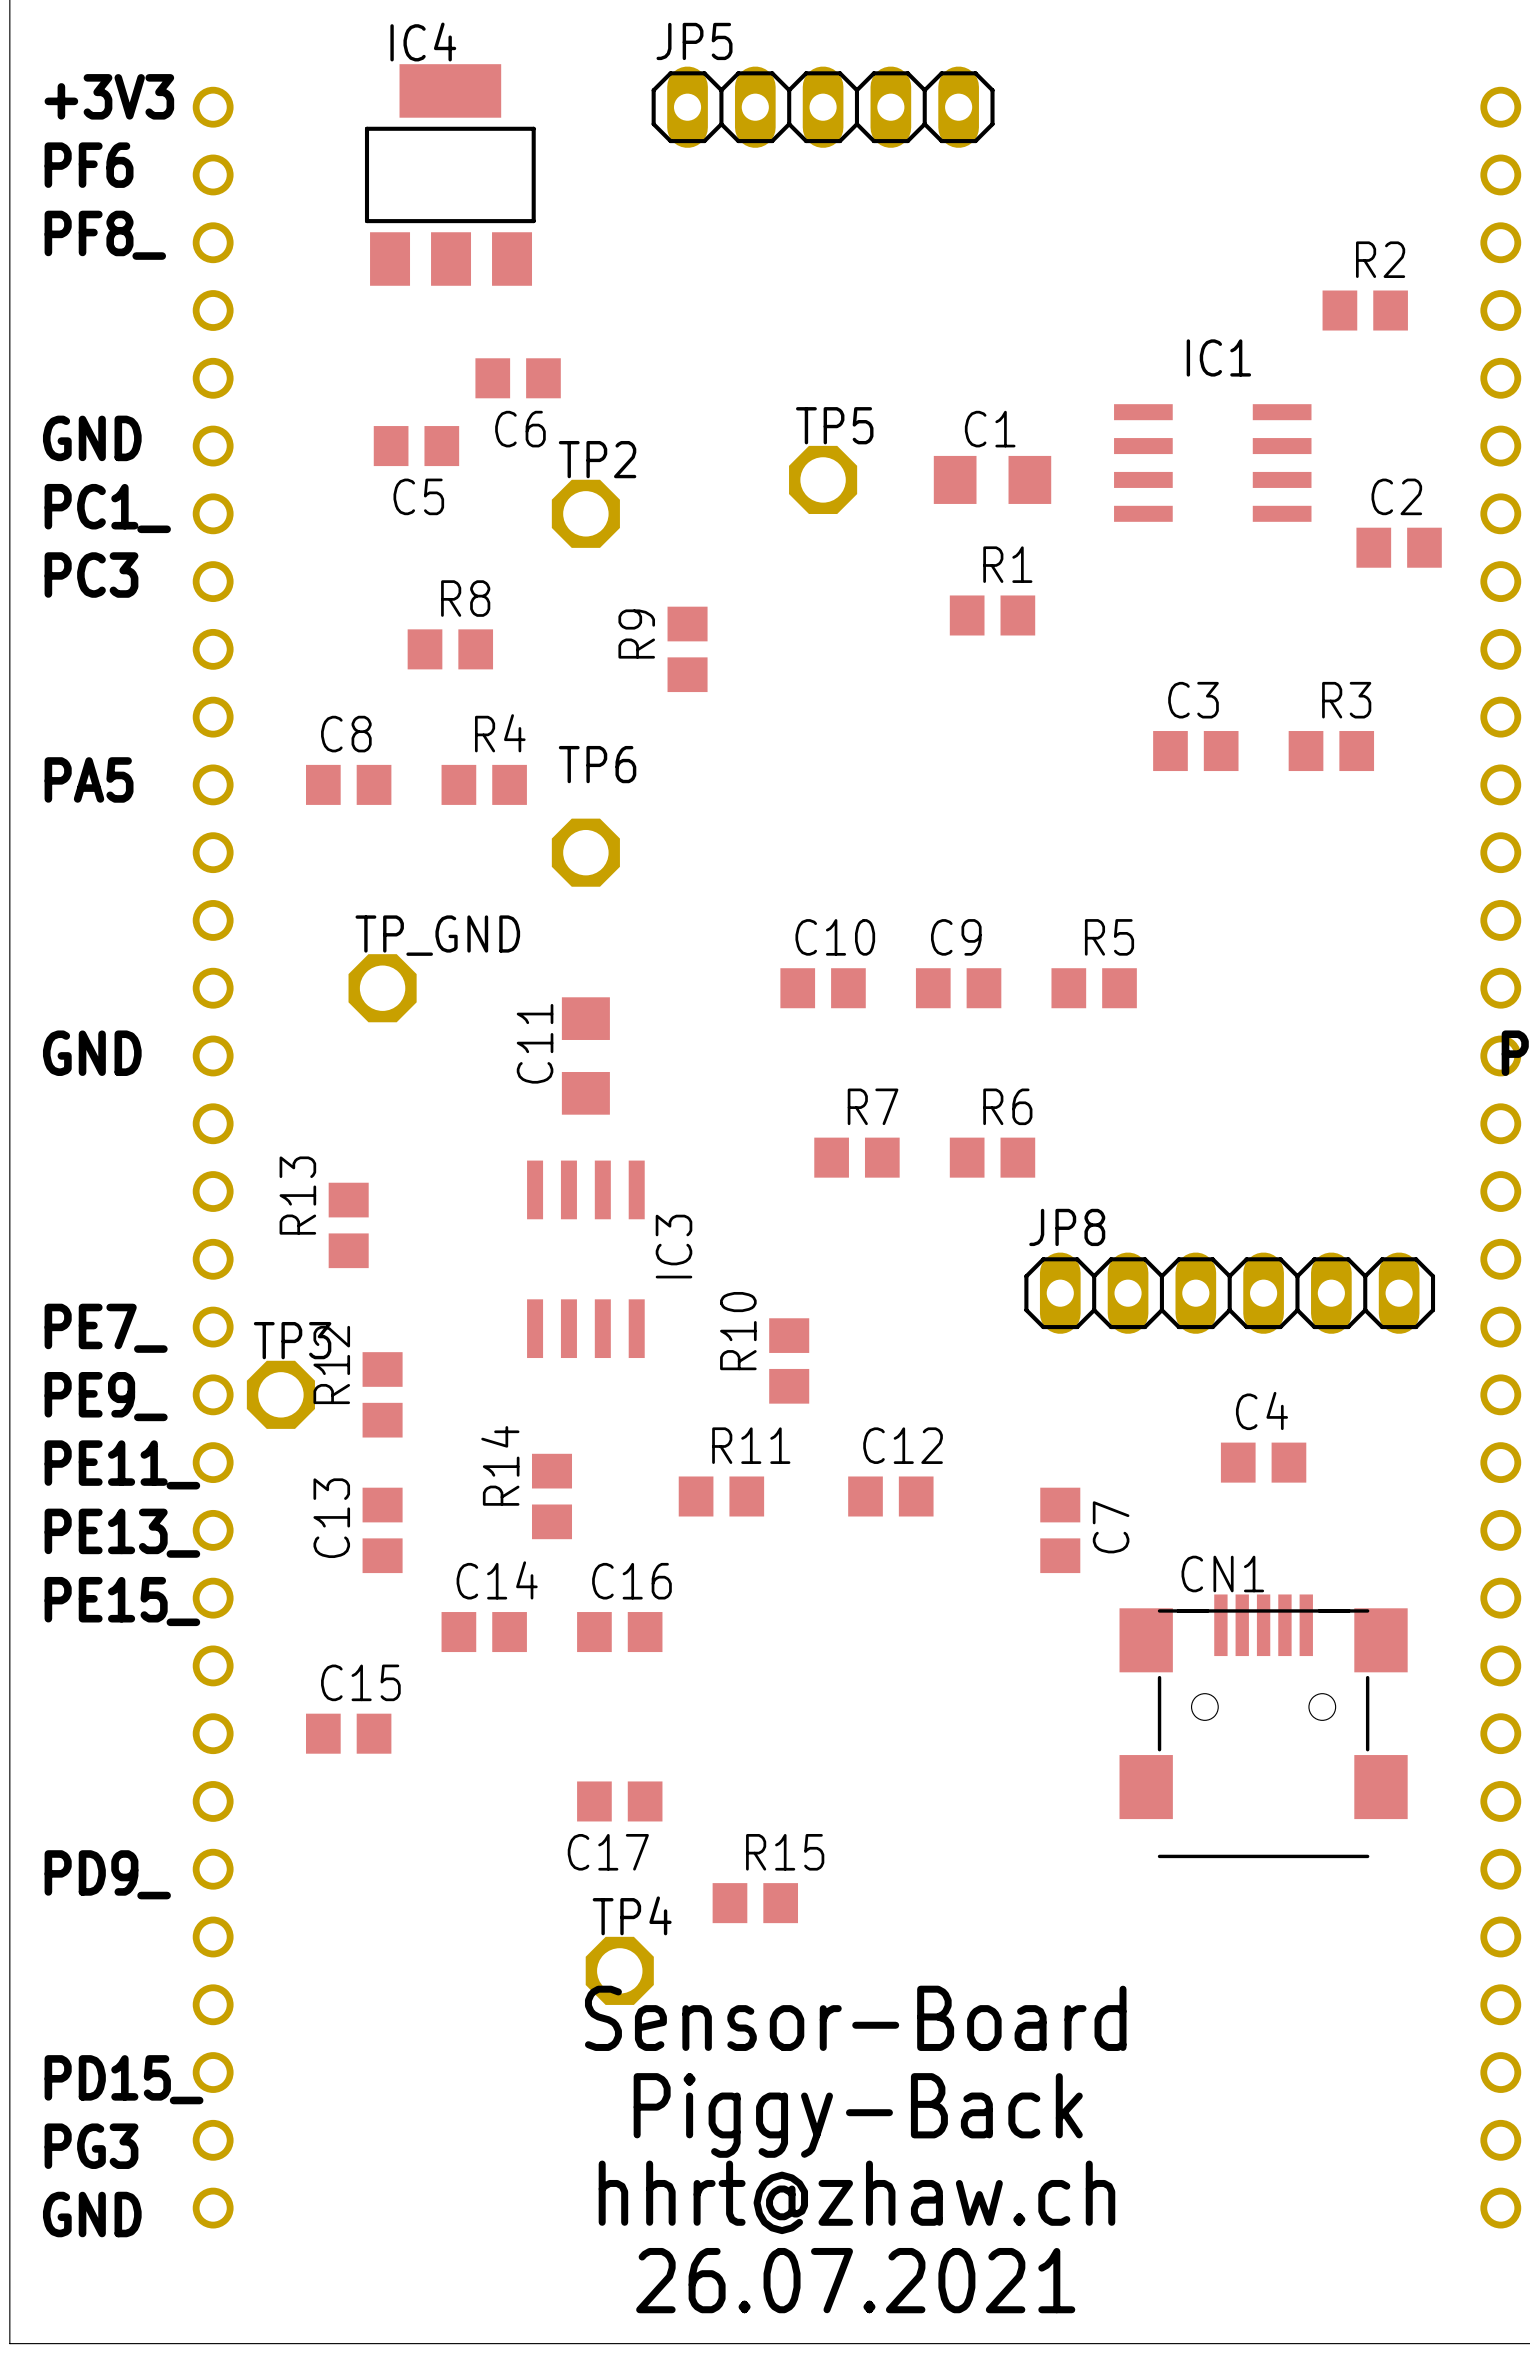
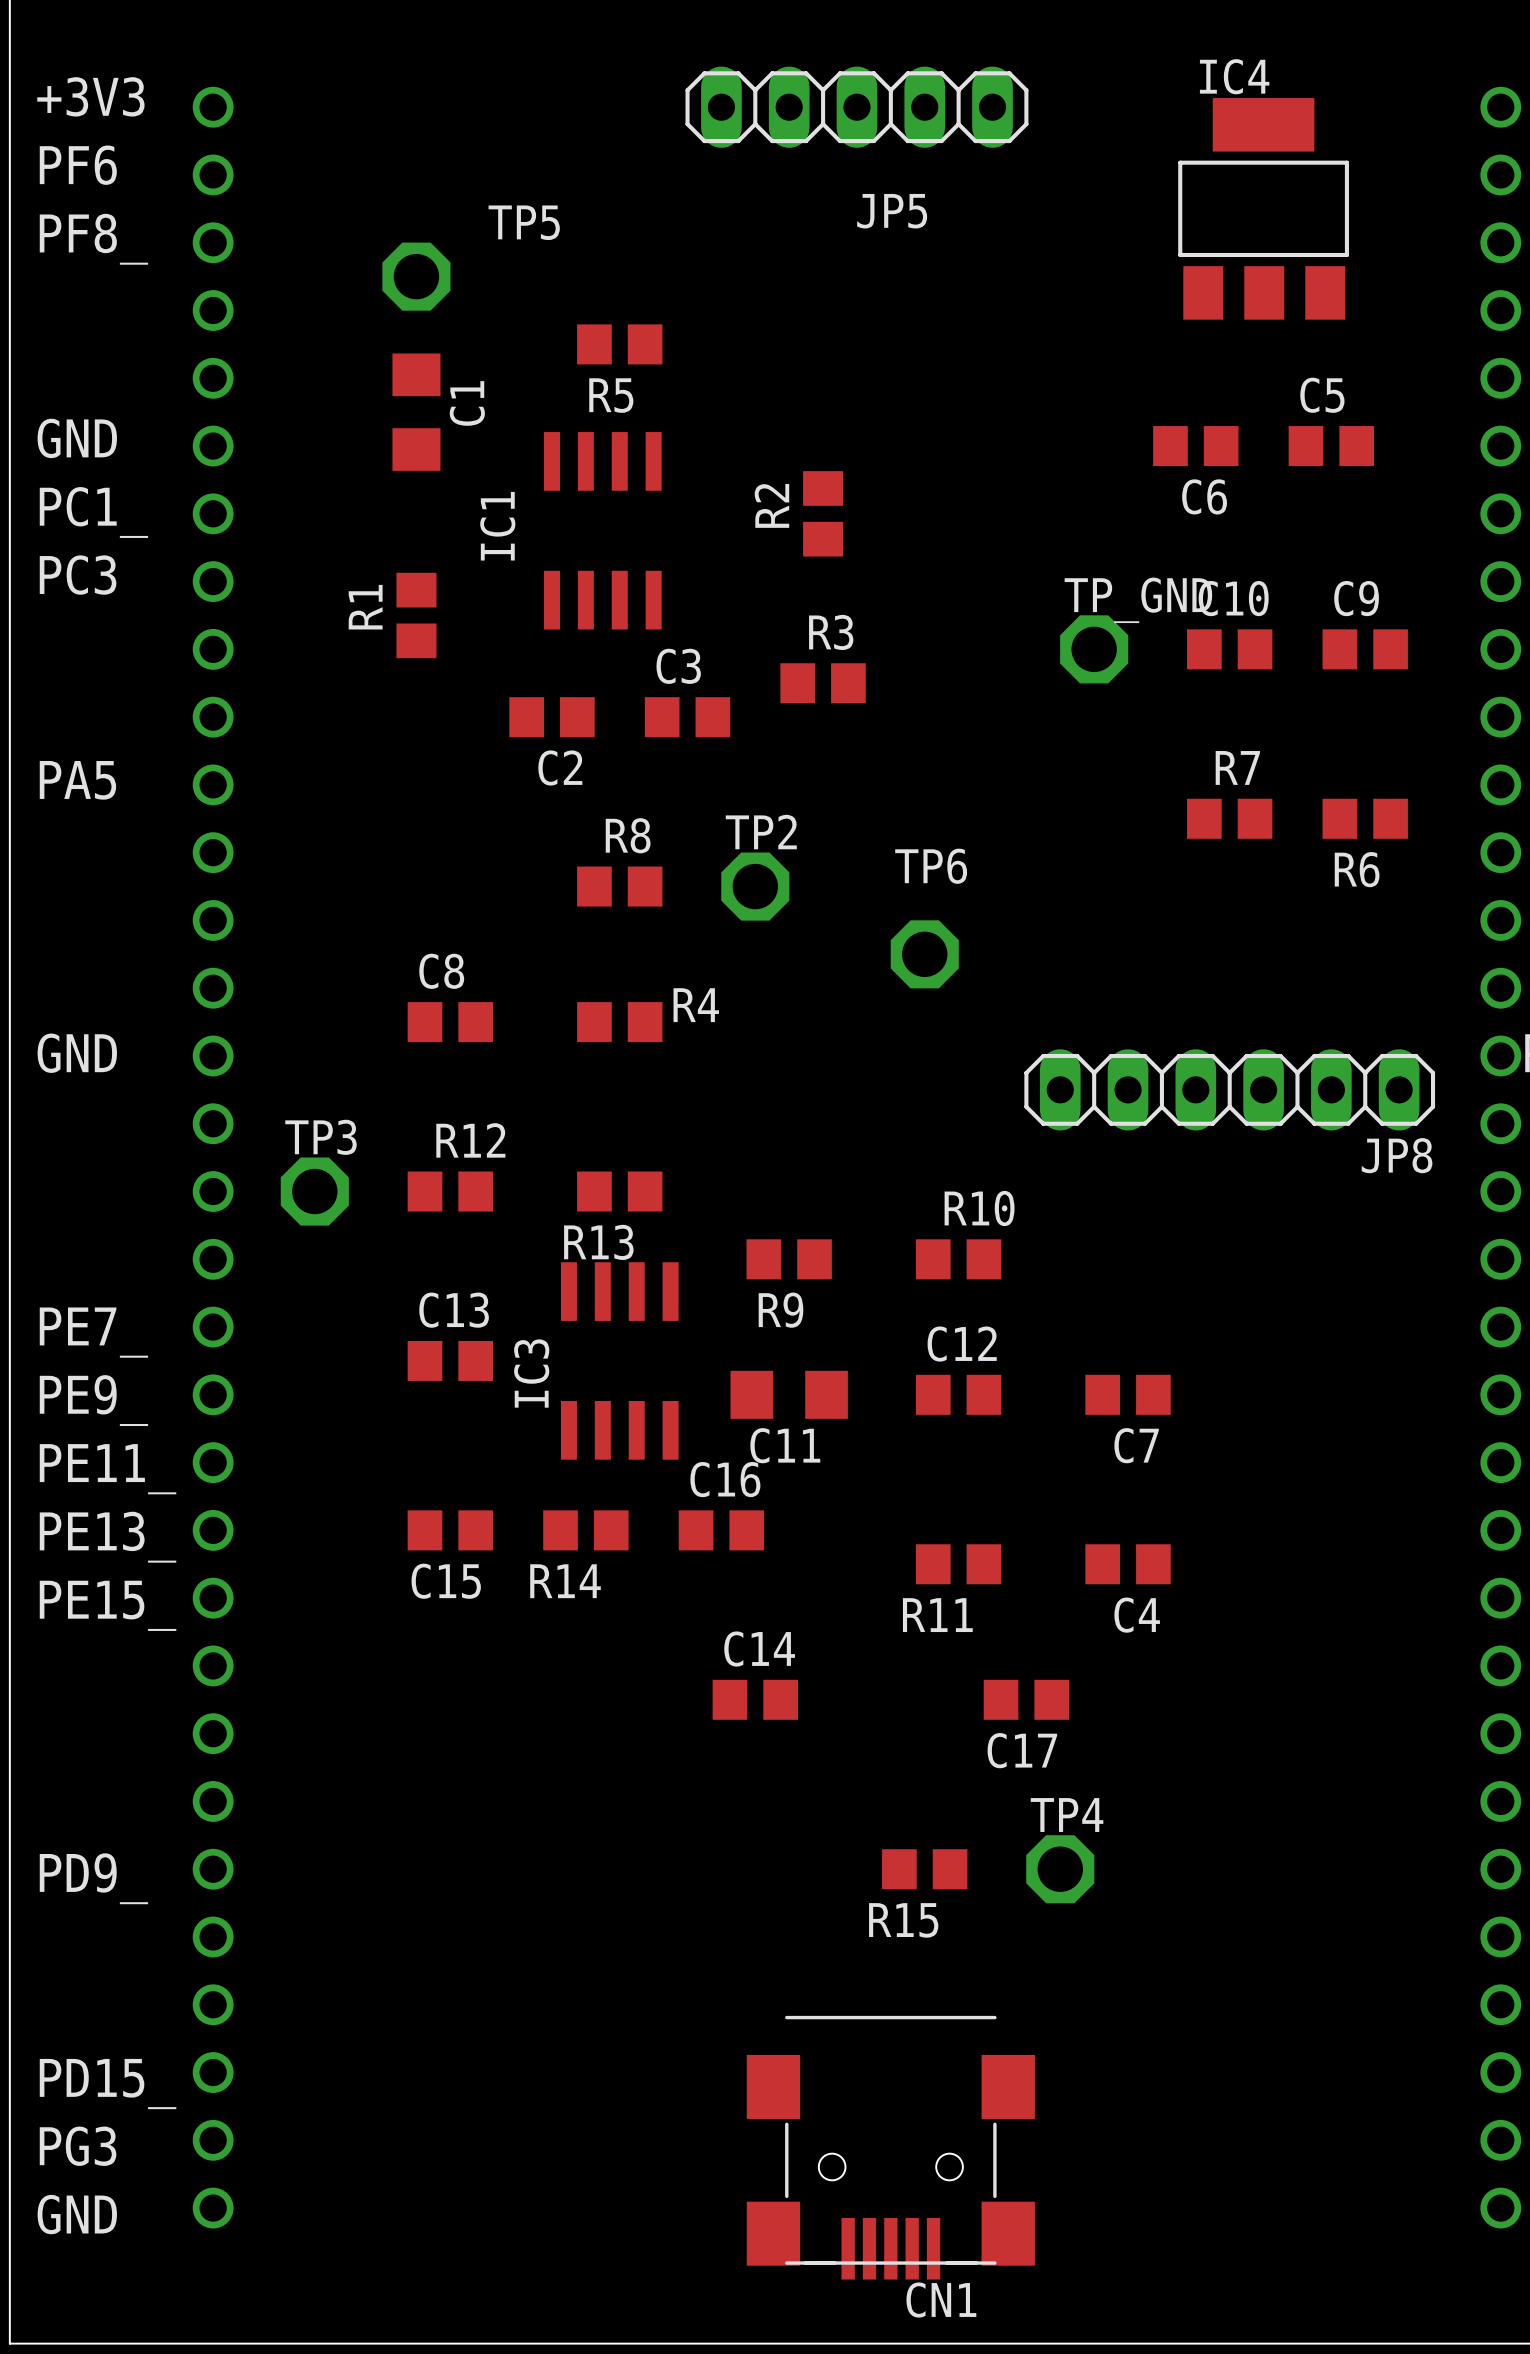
JP5 name position: JP5 (694, 41) -> JP5 (892, 211)
JP5 position: (823, 107) -> (856, 107)
IC4 position: (450, 174) -> (1263, 208)
R2 name position: R2 (1380, 259) -> R2 (771, 505)
R2 rotation: 0° (1365, 310) -> 90° clockwise (823, 513)
R2 position: (1365, 310) -> (823, 513)
IC1 name position: IC1 (1218, 357) -> IC1 (497, 526)
C6 position: (518, 378) -> (1195, 446)
TP5 name position: TP5 (834, 425) -> TP5 (524, 222)
C5 position: (416, 446) -> (1331, 446)
IC1 rotation: 0° (1212, 463) -> 90° clockwise (602, 530)
IC1 position: (1212, 463) -> (602, 530)
TP5 position: (823, 479) -> (416, 276)
C1 rotation: 0° (992, 479) -> 90° clockwise (416, 412)
C1 position: (992, 479) -> (416, 412)
C5 name position: C5 (418, 496) -> C5 (1322, 395)
C2 name position: C2 (1396, 496) -> C2 (560, 767)
TP2 position: (585, 513) -> (755, 886)
C2 position: (1399, 547) -> (552, 717)
R1 name position: R1 (1007, 564) -> R1 (365, 607)
R1 rotation: 0° (992, 615) -> 90° clockwise (416, 615)
R1 position: (992, 615) -> (416, 615)
R9 name position: R9 (636, 634) -> R9 (781, 1310)
R8 position: (450, 649) -> (619, 886)
R9 rotation: 0° (687, 649) -> 90° clockwise (789, 1259)
R9 position: (687, 649) -> (789, 1259)
TP_GND: none -> (1094, 649)
R4 name position: R4 (500, 733) -> R4 (696, 1005)
C3 position: (1195, 751) -> (687, 717)
R3 position: (1331, 751) -> (823, 683)
C8 position: (348, 784) -> (450, 1022)
R4 position: (484, 784) -> (619, 1022)
TP6 position: (585, 852) -> (924, 954)
R5 name position: R5 (1109, 937) -> R5 (611, 395)
TP_GND: (382, 988) -> none
C10 position: (823, 988) -> (1229, 649)
C9 position: (958, 988) -> (1365, 649)
R5 position: (1094, 988) -> (619, 344)
C11 name position: C11 (535, 1043) -> C11 (785, 1445)
C11 rotation: 0° (585, 1055) -> 90° clockwise (789, 1394)
C11 position: (585, 1055) -> (789, 1394)
R6 name position: R6 (1007, 1106) -> R6 (1357, 869)
R7 position: (856, 1157) -> (1229, 818)
R6 position: (992, 1157) -> (1365, 818)
R13 name position: R13 (297, 1195) -> R13 (598, 1242)
R13 rotation: 0° (348, 1225) -> 90° clockwise (619, 1191)
R13 position: (348, 1225) -> (619, 1191)
JP8 name position: JP8 (1067, 1227) -> JP8 (1397, 1155)
IC3 name position: IC3 (673, 1246) -> IC3 (531, 1373)
IC3 position: (585, 1259) -> (619, 1360)
JP8 position: (1229, 1293) -> (1229, 1089)
R10 rotation: 0° (789, 1360) -> 90° clockwise (958, 1259)
R10 position: (789, 1360) -> (958, 1259)
TP3 position: (280, 1394) -> (314, 1191)
R12 rotation: 0° (382, 1394) -> 90° clockwise (450, 1191)
R12 position: (382, 1394) -> (450, 1191)
C4 name position: C4 (1261, 1410) -> C4 (1137, 1615)
R11 name position: R11 (751, 1445) -> R11 (937, 1615)
C4 position: (1263, 1462) -> (1128, 1564)
R14 name position: R14 (500, 1465) -> R14 (565, 1581)
R14 rotation: 0° (552, 1496) -> 90° clockwise (585, 1530)
R11 position: (721, 1496) -> (958, 1564)
C12 position: (890, 1496) -> (958, 1394)
C13 rotation: 0° (382, 1530) -> 90° clockwise (450, 1360)
C13 position: (382, 1530) -> (450, 1360)
C7 rotation: 0° (1060, 1530) -> 90° clockwise (1128, 1394)
C7 position: (1060, 1530) -> (1128, 1394)
C14 position: (484, 1632) -> (755, 1699)
C16 position: (619, 1632) -> (721, 1530)
C15 name position: C15 (360, 1682) -> C15 (446, 1581)
CN1 rotation: 0° (1263, 1726) -> 180° (890, 2147)
CN1 position: (1263, 1726) -> (890, 2147)
C15 position: (348, 1733) -> (450, 1530)
C17 position: (619, 1801) -> (1026, 1699)
R15 name position: R15 (785, 1852) -> R15 (903, 1920)
R15 position: (755, 1903) -> (924, 1869)
TP4 position: (619, 1970) -> (1060, 1869)
text: Sensor-Board (855, 2018) -> none
text: Piggy-Back (858, 2115) -> none
text: hhrt@zhaw.ch (856, 2197) -> none
text: 26.07.2021 (855, 2280) -> none

